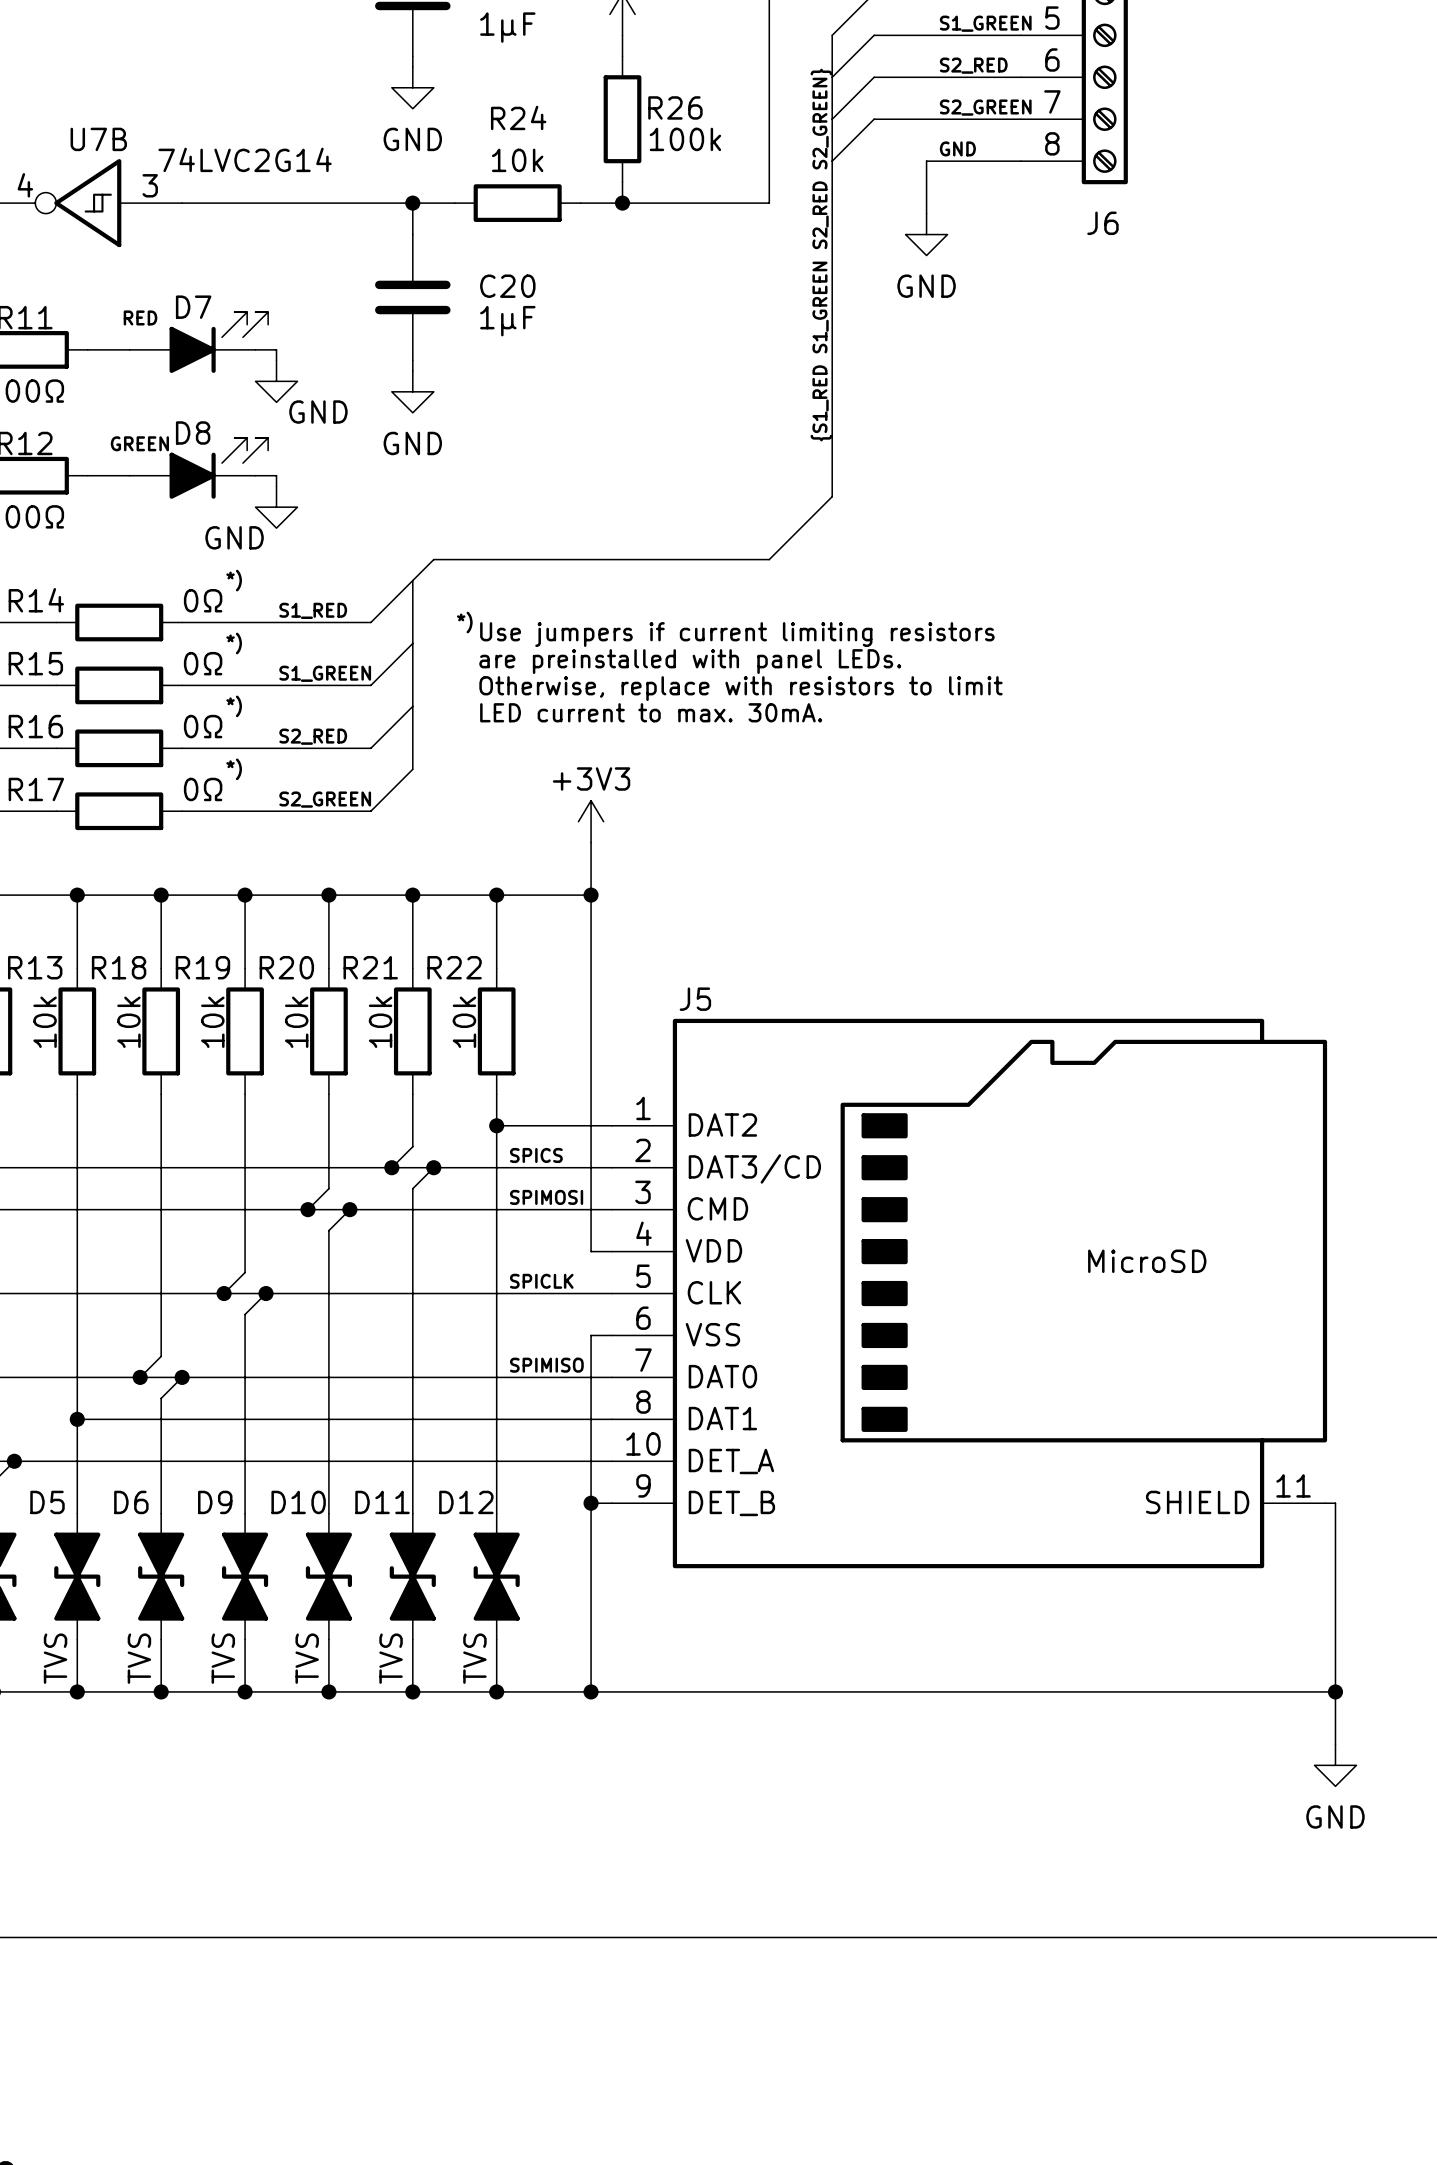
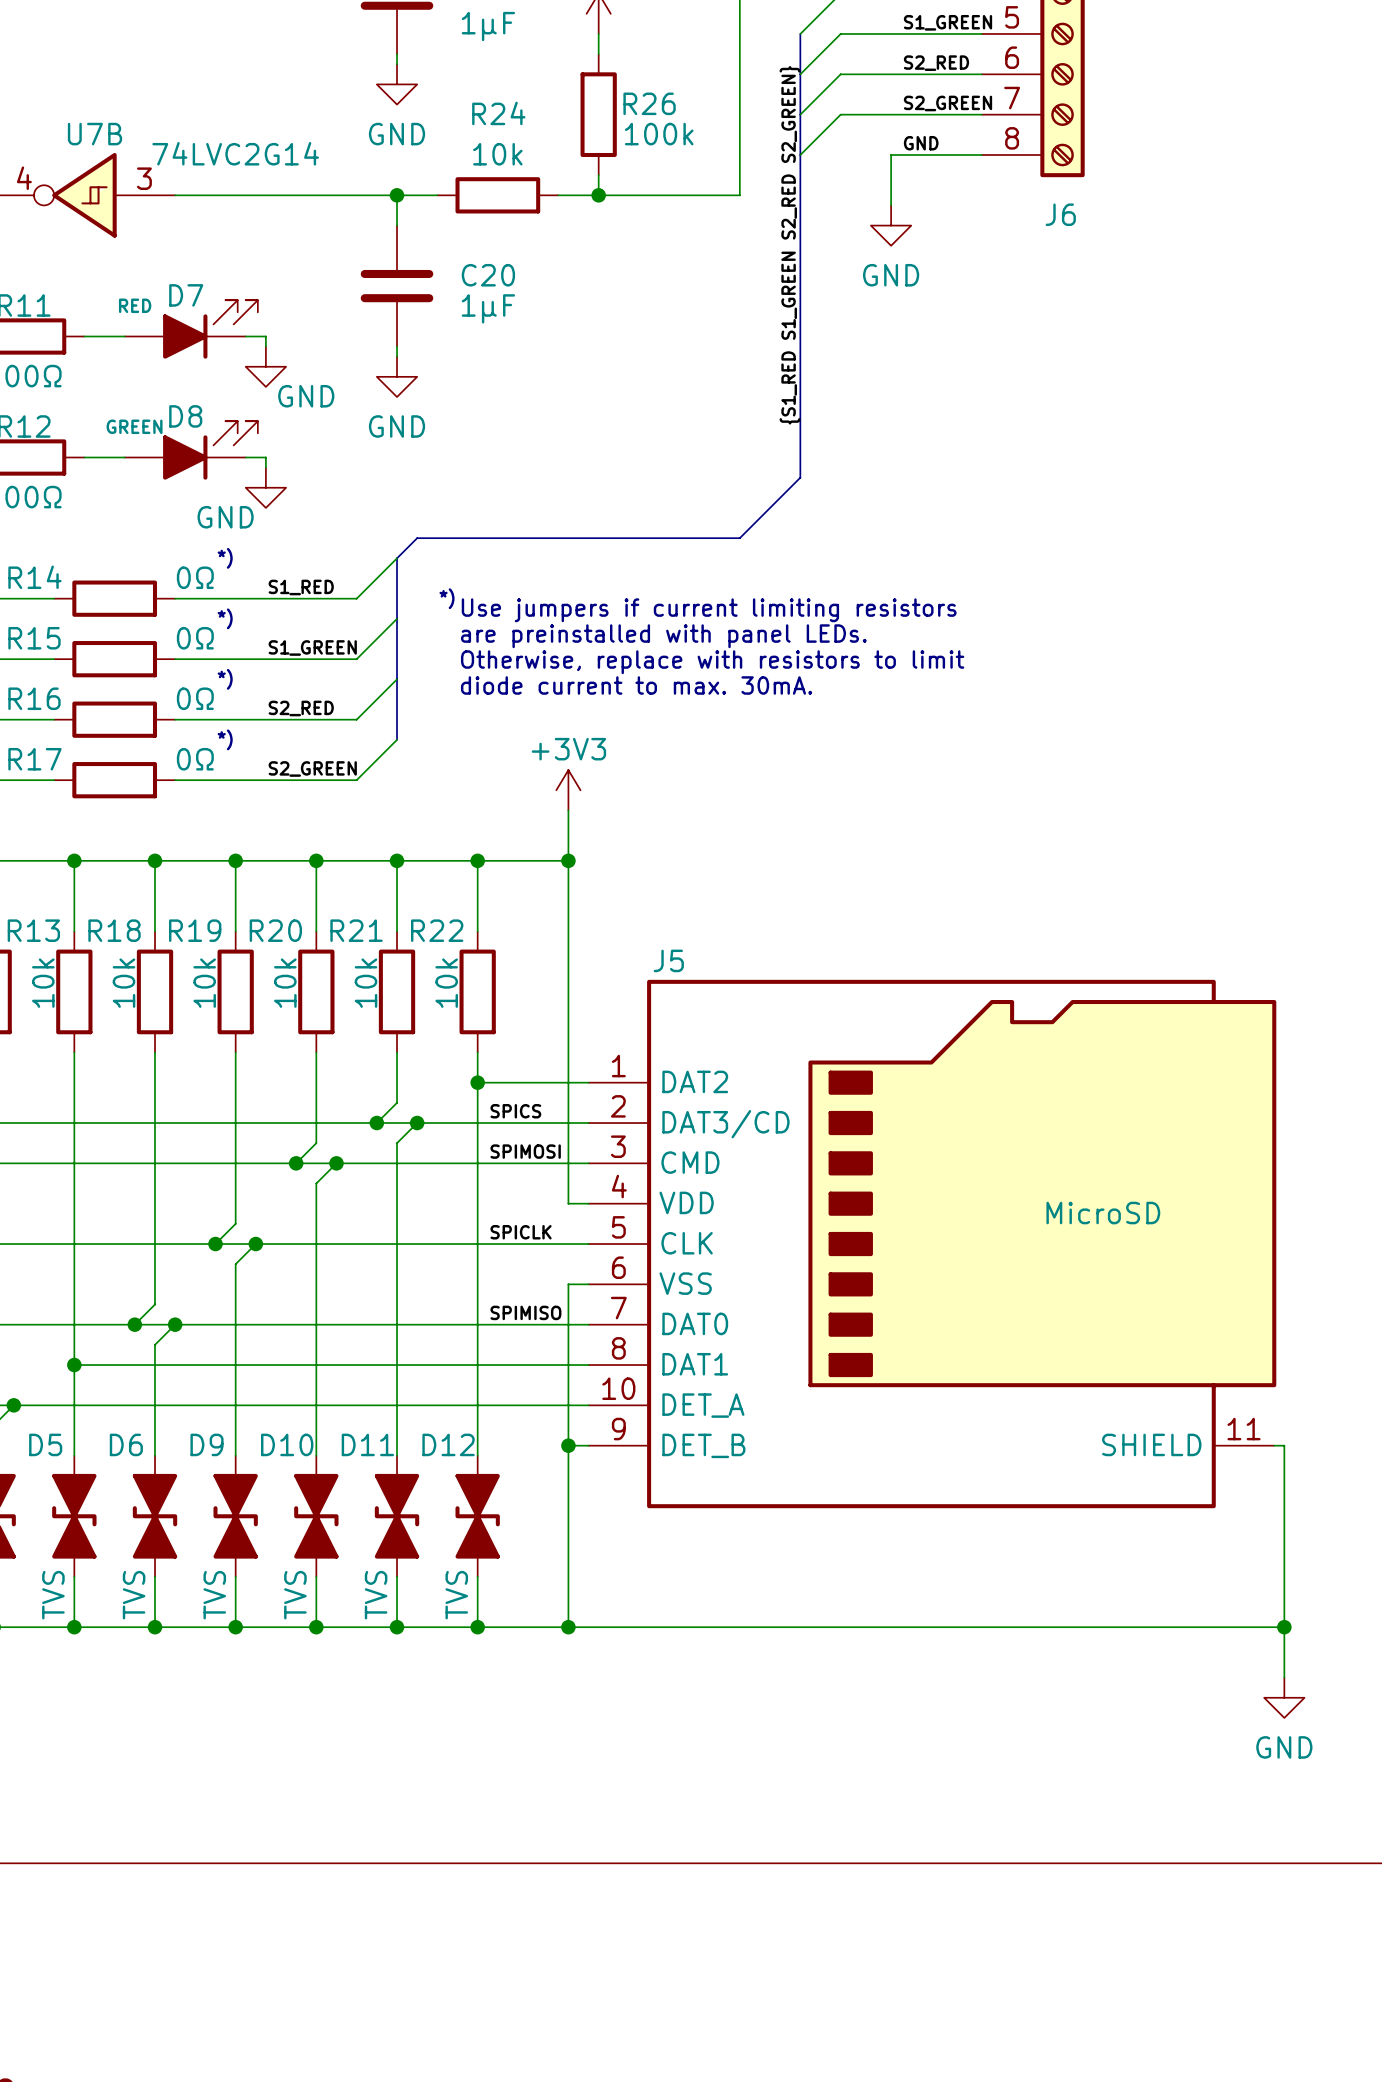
text: LED current to max. 30mA. (651, 712) -> diode current to max. 30mA. (636, 685)

